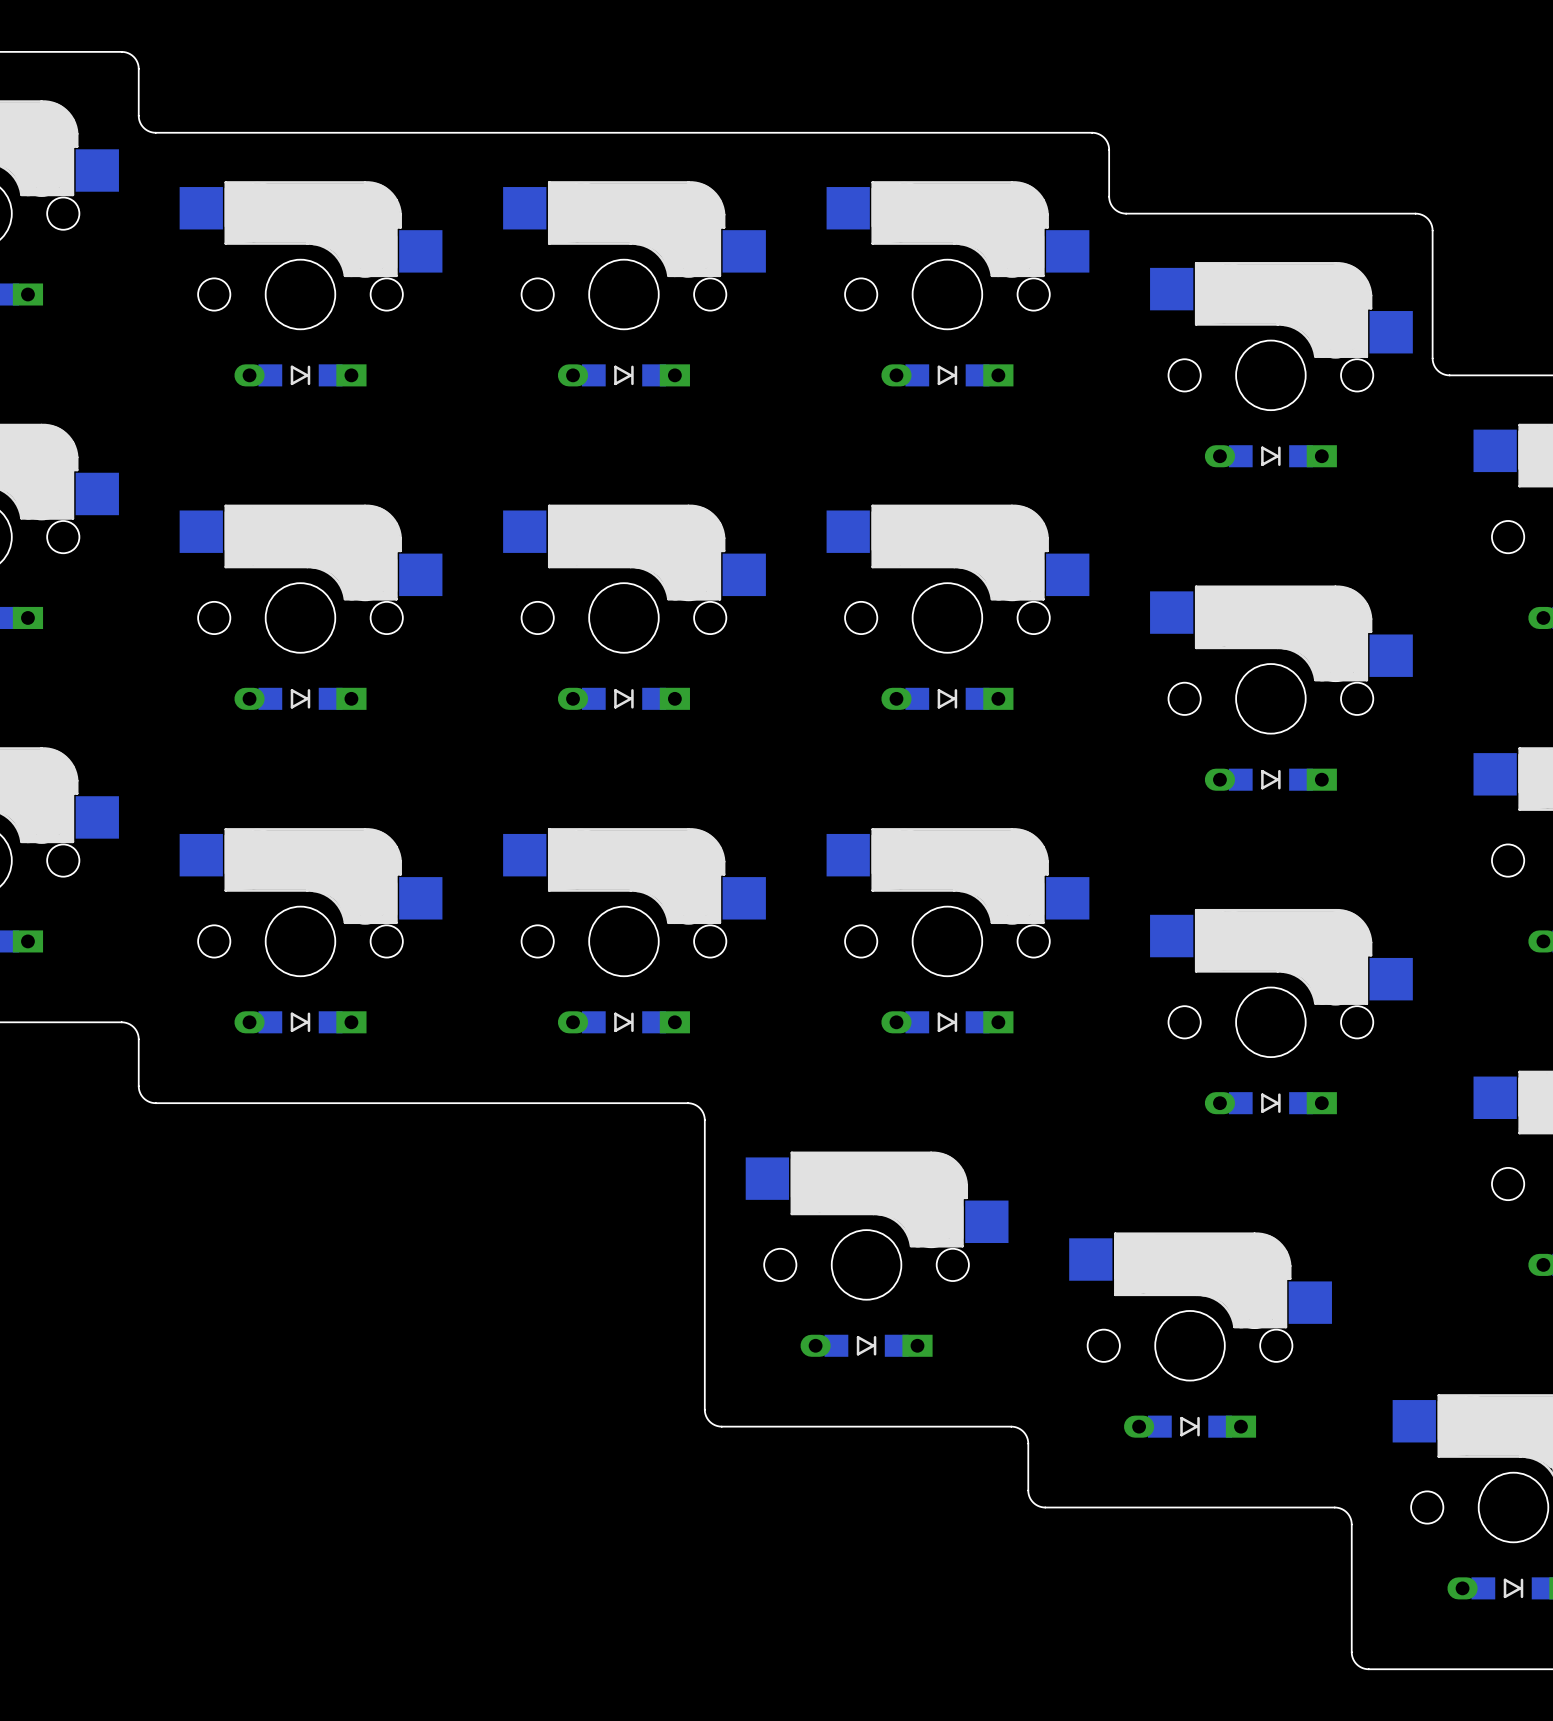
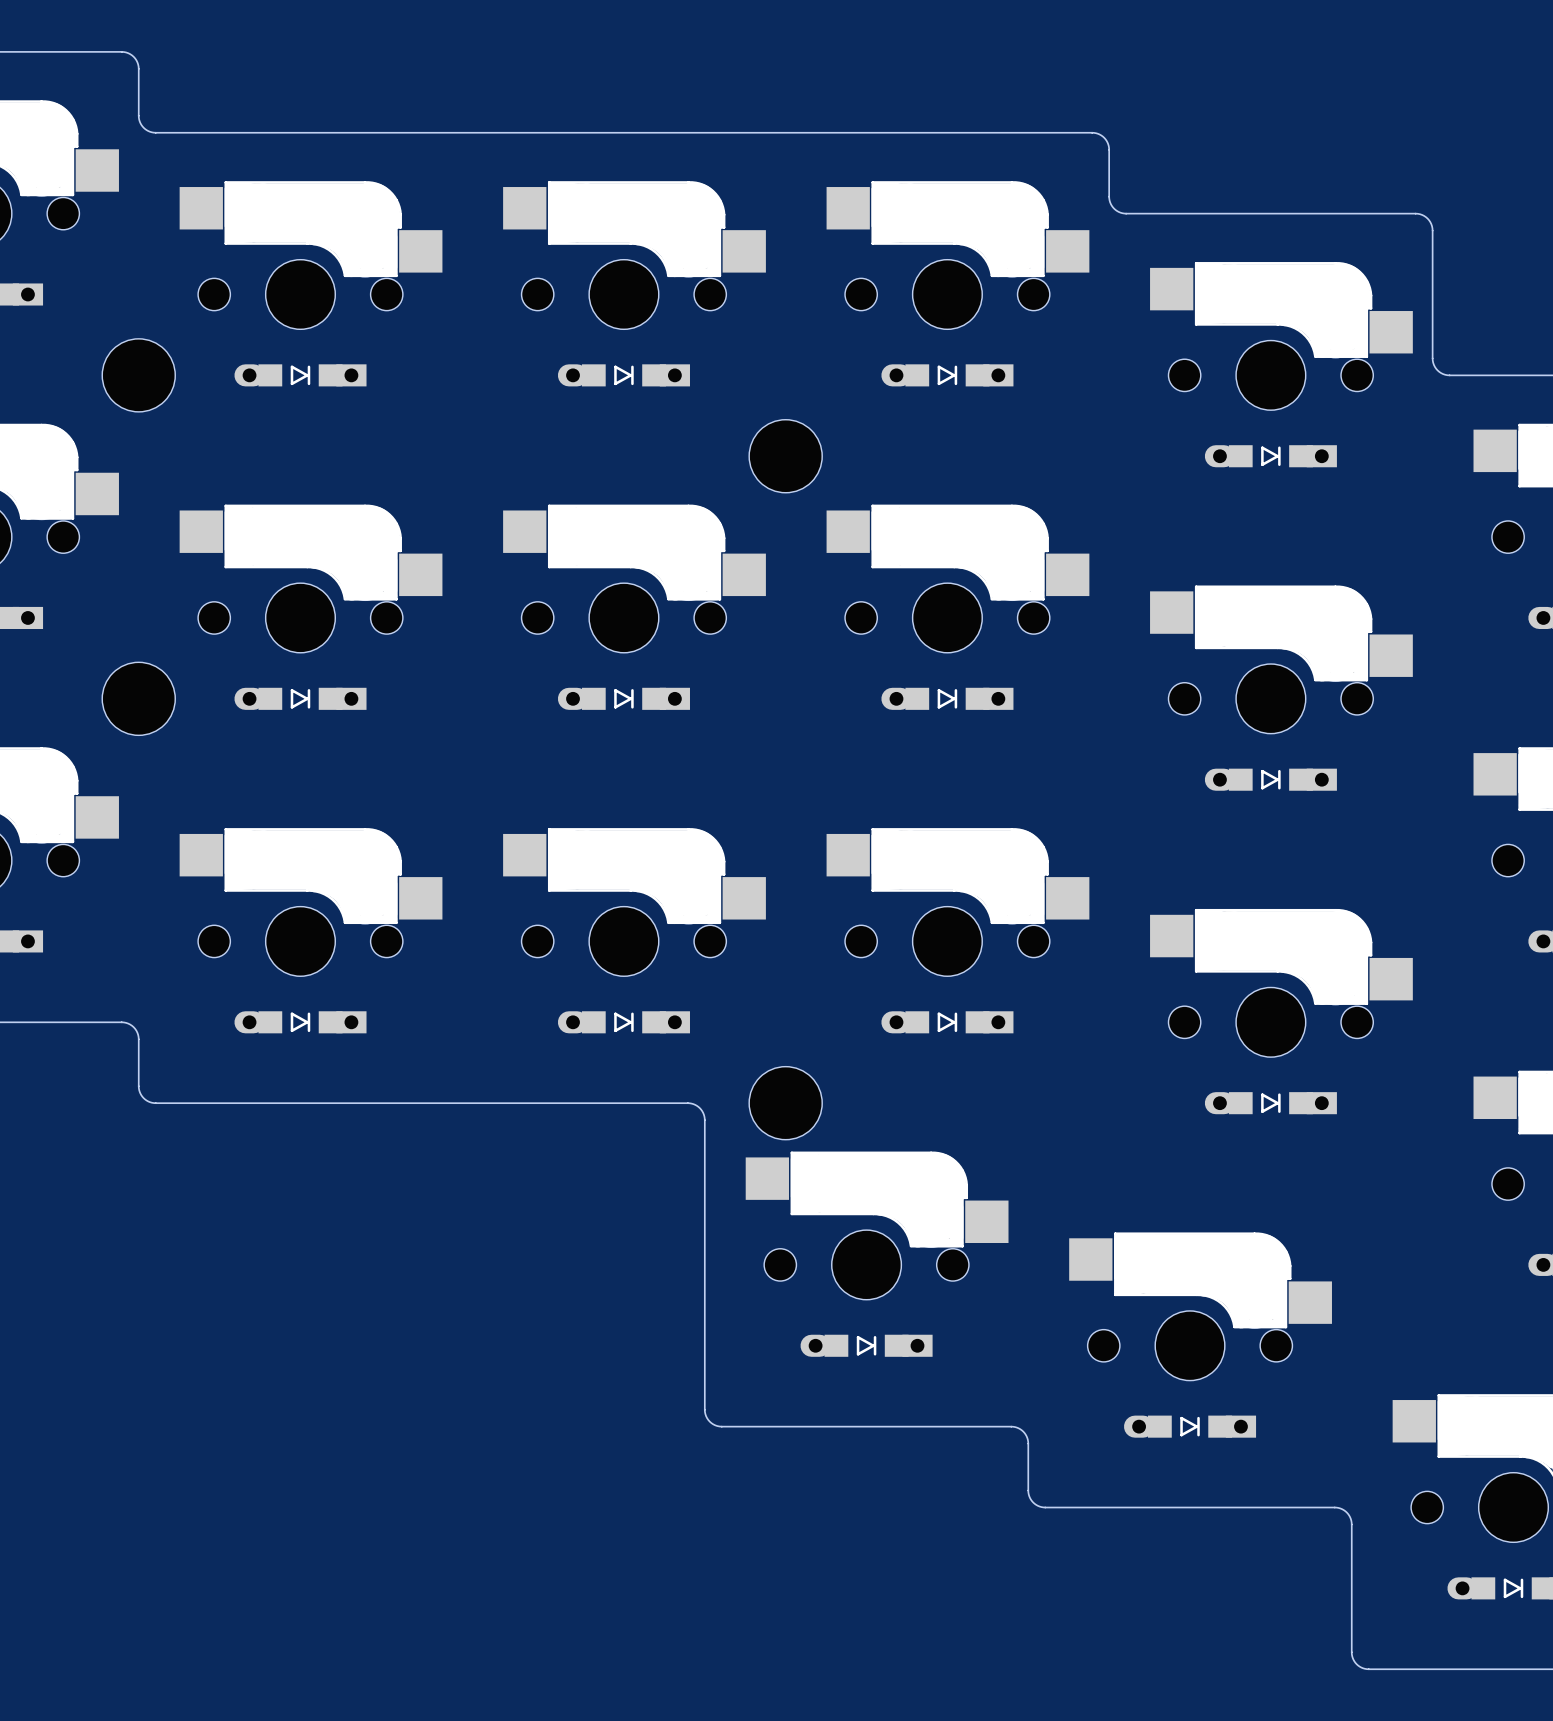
part: none -> (138, 375)
part: none -> (785, 456)
part: none -> (138, 698)
part: none -> (785, 1103)

